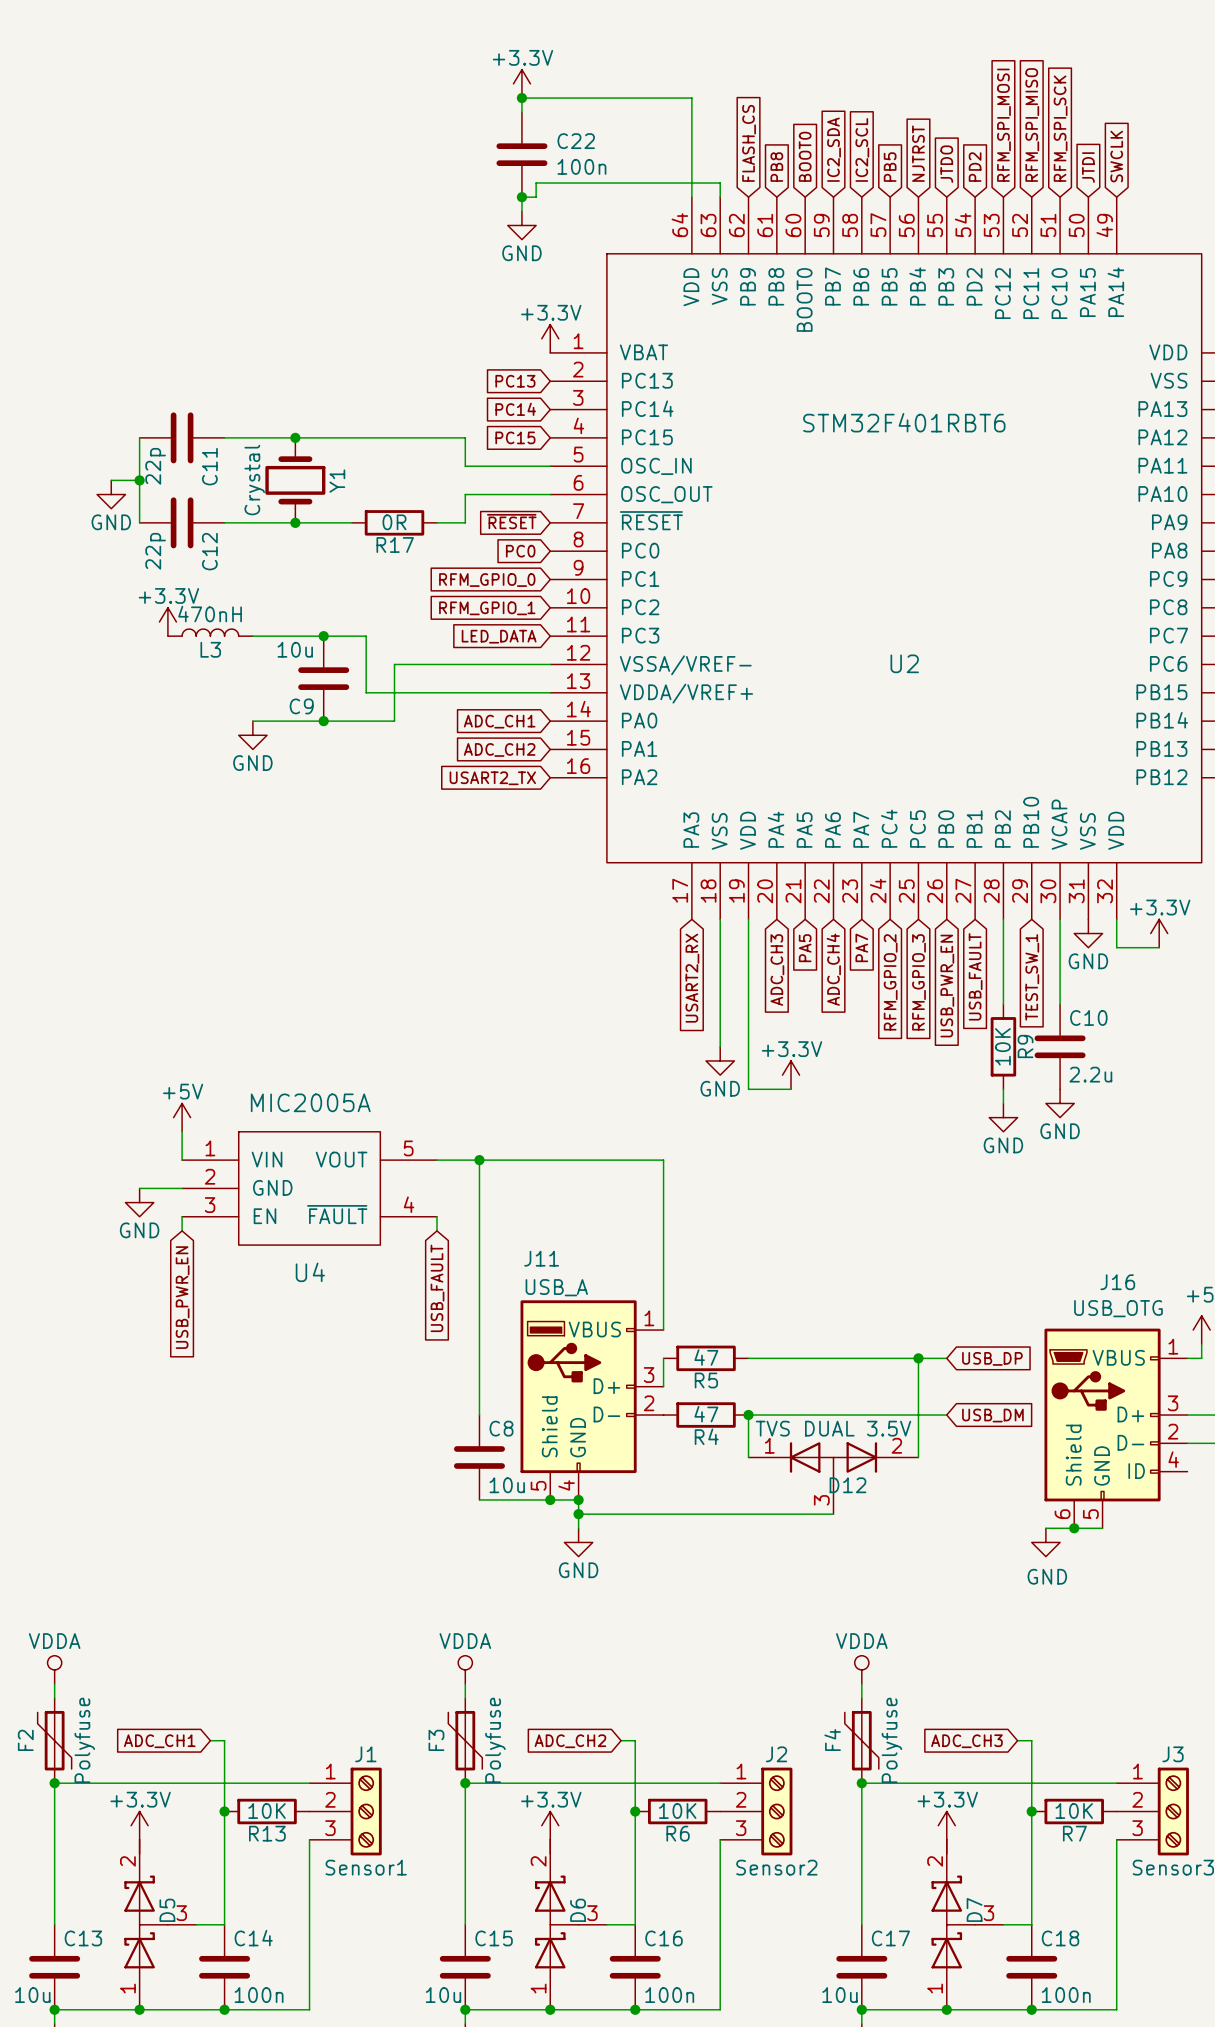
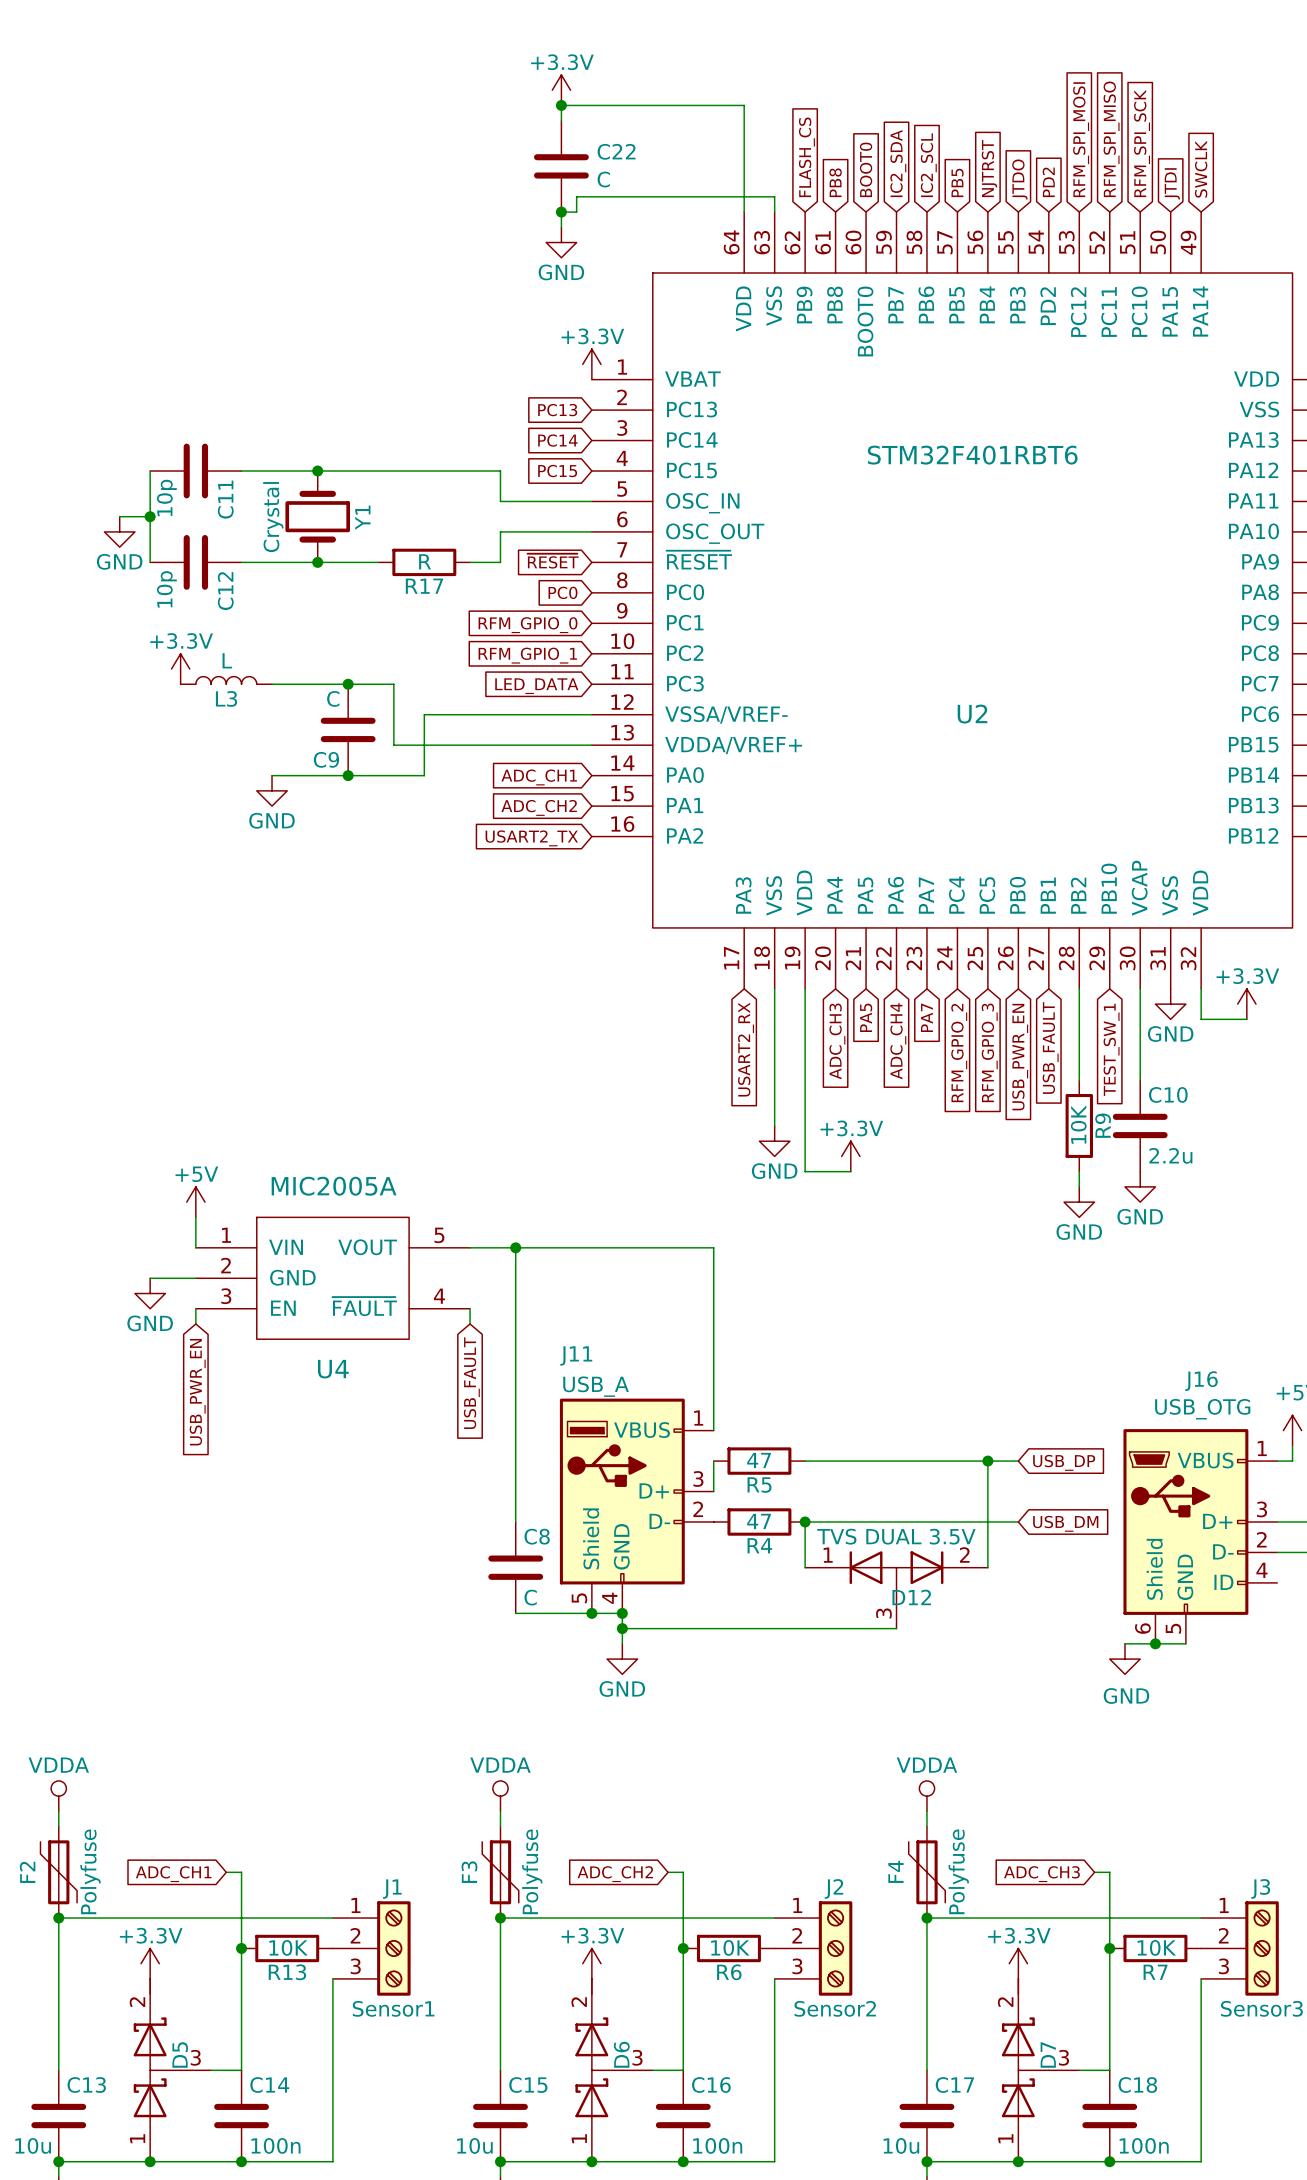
C22 value: 100n (581, 166) -> C (603, 179)
C11 value: 22p (155, 466) -> 10p (166, 497)
R17 value: 0R (394, 522) -> R (425, 561)
C12 value: 22p (155, 551) -> 10p (166, 589)
L3 value: 470nH (210, 614) -> L (227, 660)
C9 value: 10u (295, 649) -> C (333, 698)
C8 value: 10u (507, 1485) -> C (530, 1597)

